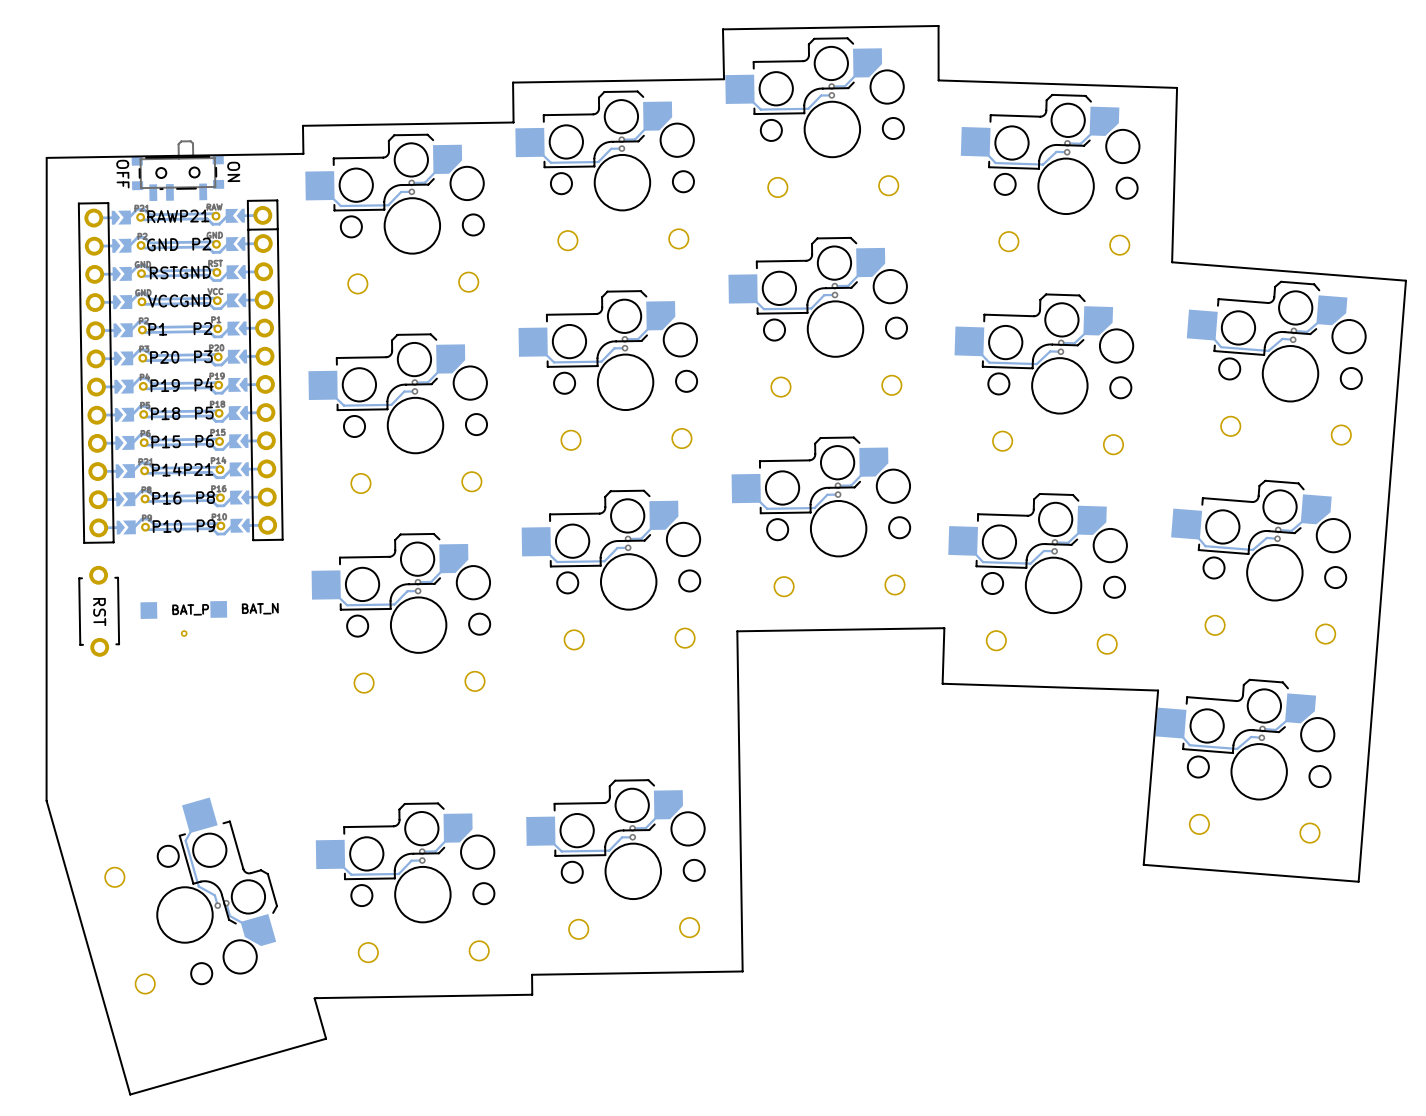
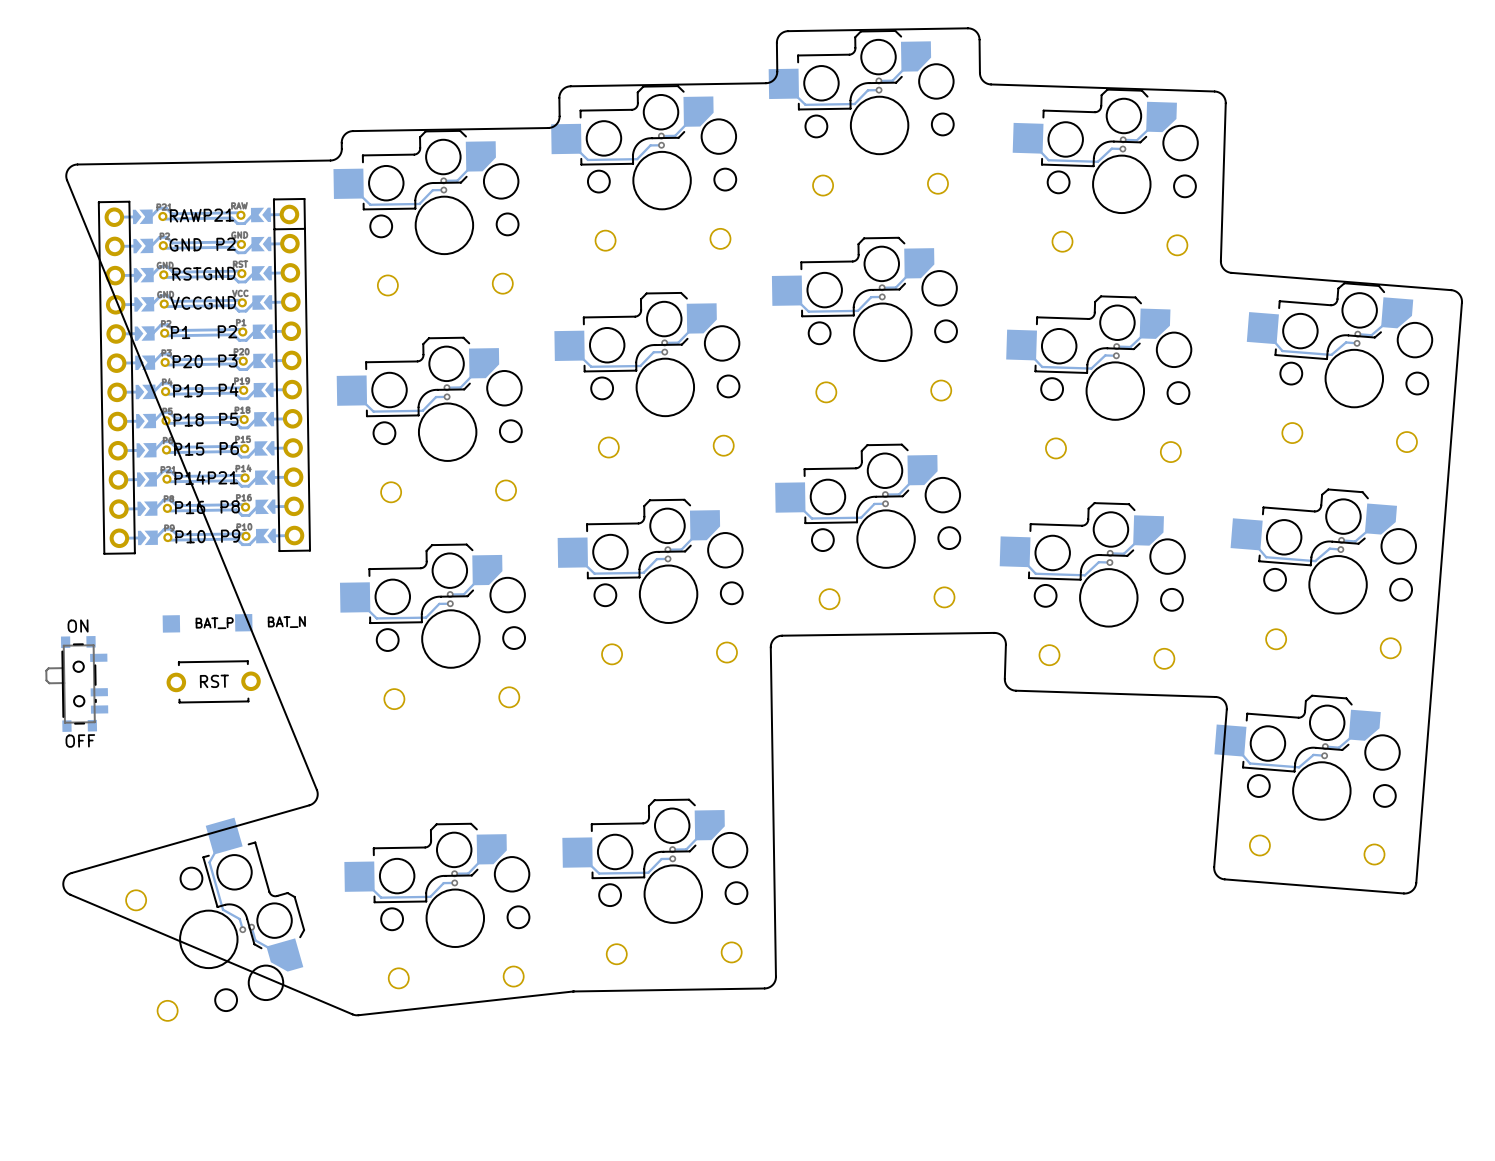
board edge: (938, 25) (938, 80) (1177, 87) (1172, 262) (1405, 280) (1358, 881) (1143, 864) (1158, 690) (942, 683) (944, 628) (737, 631) (742, 971) (532, 974) (532, 994) (314, 998) (326, 1038) (130, 1094) (46, 800) (46, 157) (303, 153) (302, 125) (513, 122) (513, 82) (724, 79) (722, 29) (938, 25) -> (967, 28) (975, 30) (978, 35) (980, 74) (983, 81) (988, 84) (1214, 91) (1222, 95) (1225, 103) (1220, 261) (1222, 267) (1227, 271) (1451, 290) (1457, 292) (1460, 296) (1461, 302) (1416, 882) (1412, 890) (1403, 893) (1219, 877) (1214, 868) (1226, 709) (1223, 700) (1215, 696) (1013, 690) (1007, 687) (1005, 681) (1005, 640) (1001, 635) (994, 632) (782, 635) (772, 641) (770, 647) (775, 976) (773, 984) (767, 988) (573, 991) (355, 1015) (66, 892) (63, 881) (70, 873) (309, 805) (315, 800) (317, 793) (67, 180) (66, 173) (69, 167) (77, 164) (331, 160) (340, 153) (343, 136) (351, 131) (549, 127) (555, 125) (559, 119) (560, 93) (563, 88) (569, 86) (770, 82) (775, 78) (777, 73) (777, 39) (780, 34) (785, 31) (967, 28)
part: (177, 170) -> none
part rotation: 0° (99, 611) -> 90° clockwise (213, 681)
part position: (99, 611) -> (213, 681)
part: (184, 633) -> none
part: none -> (76, 683)

